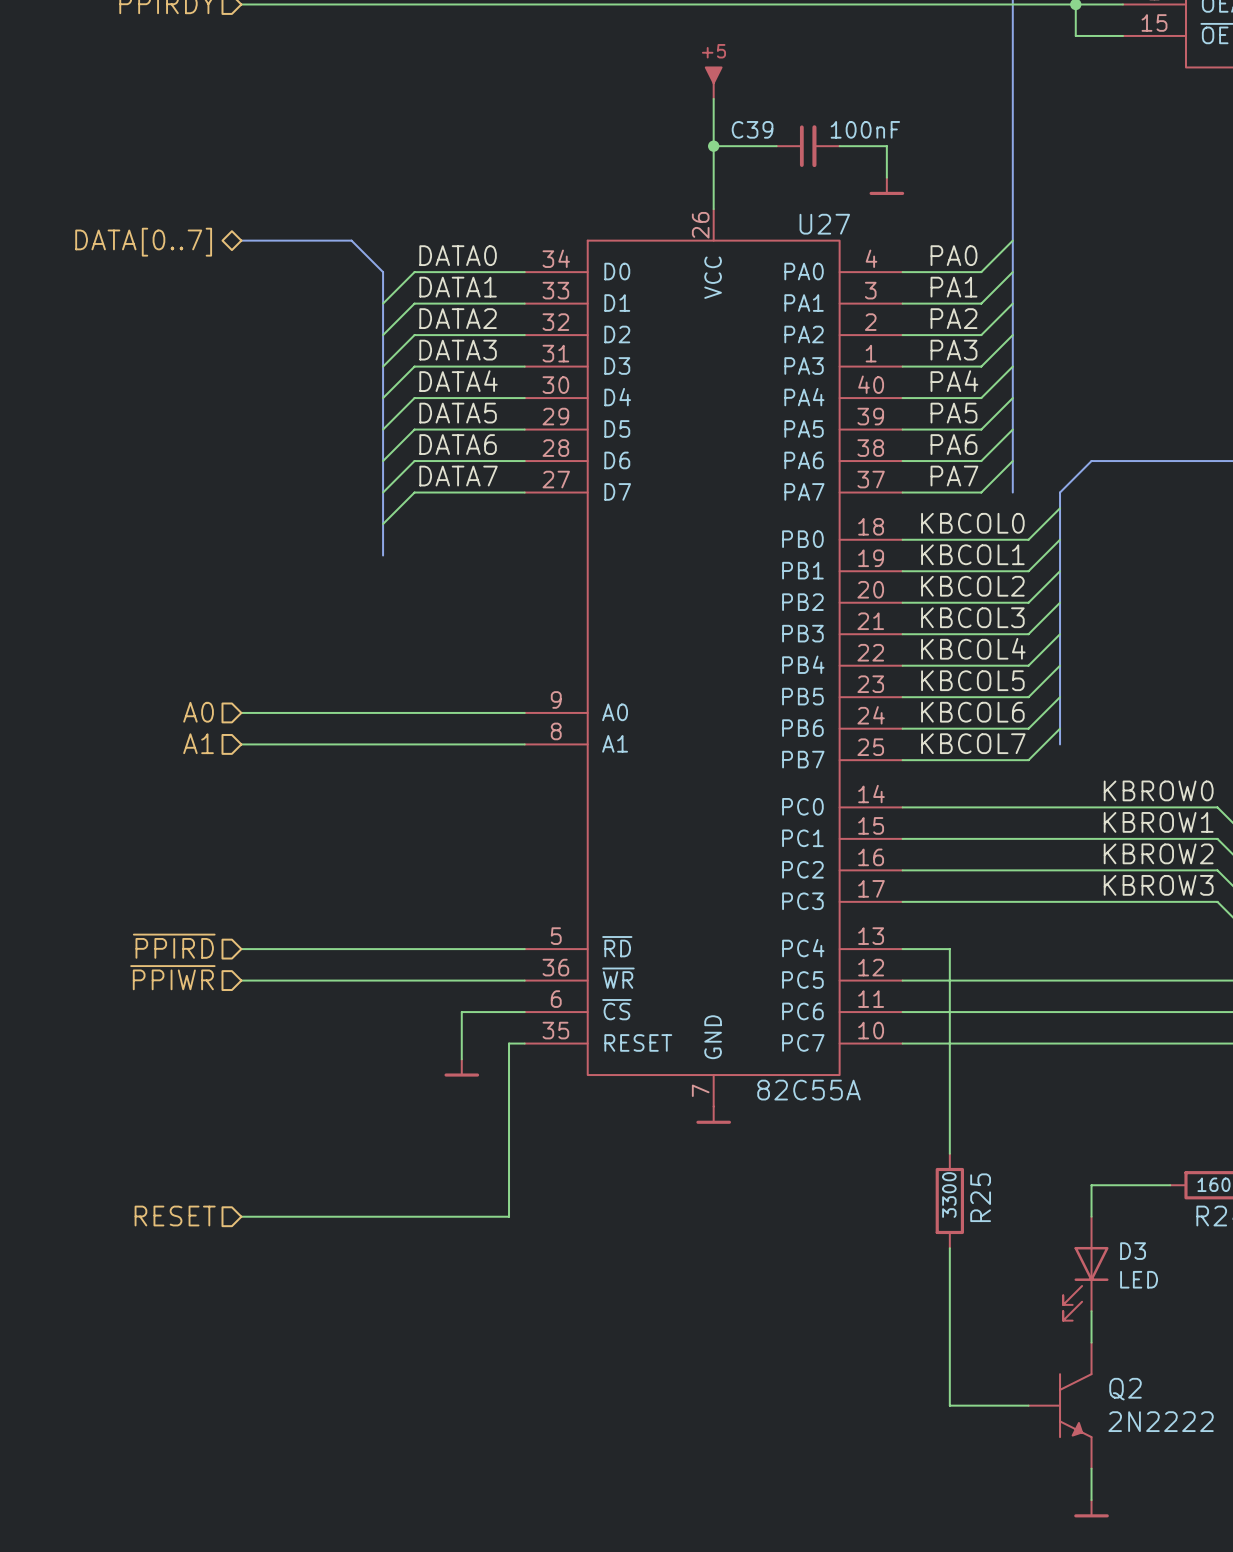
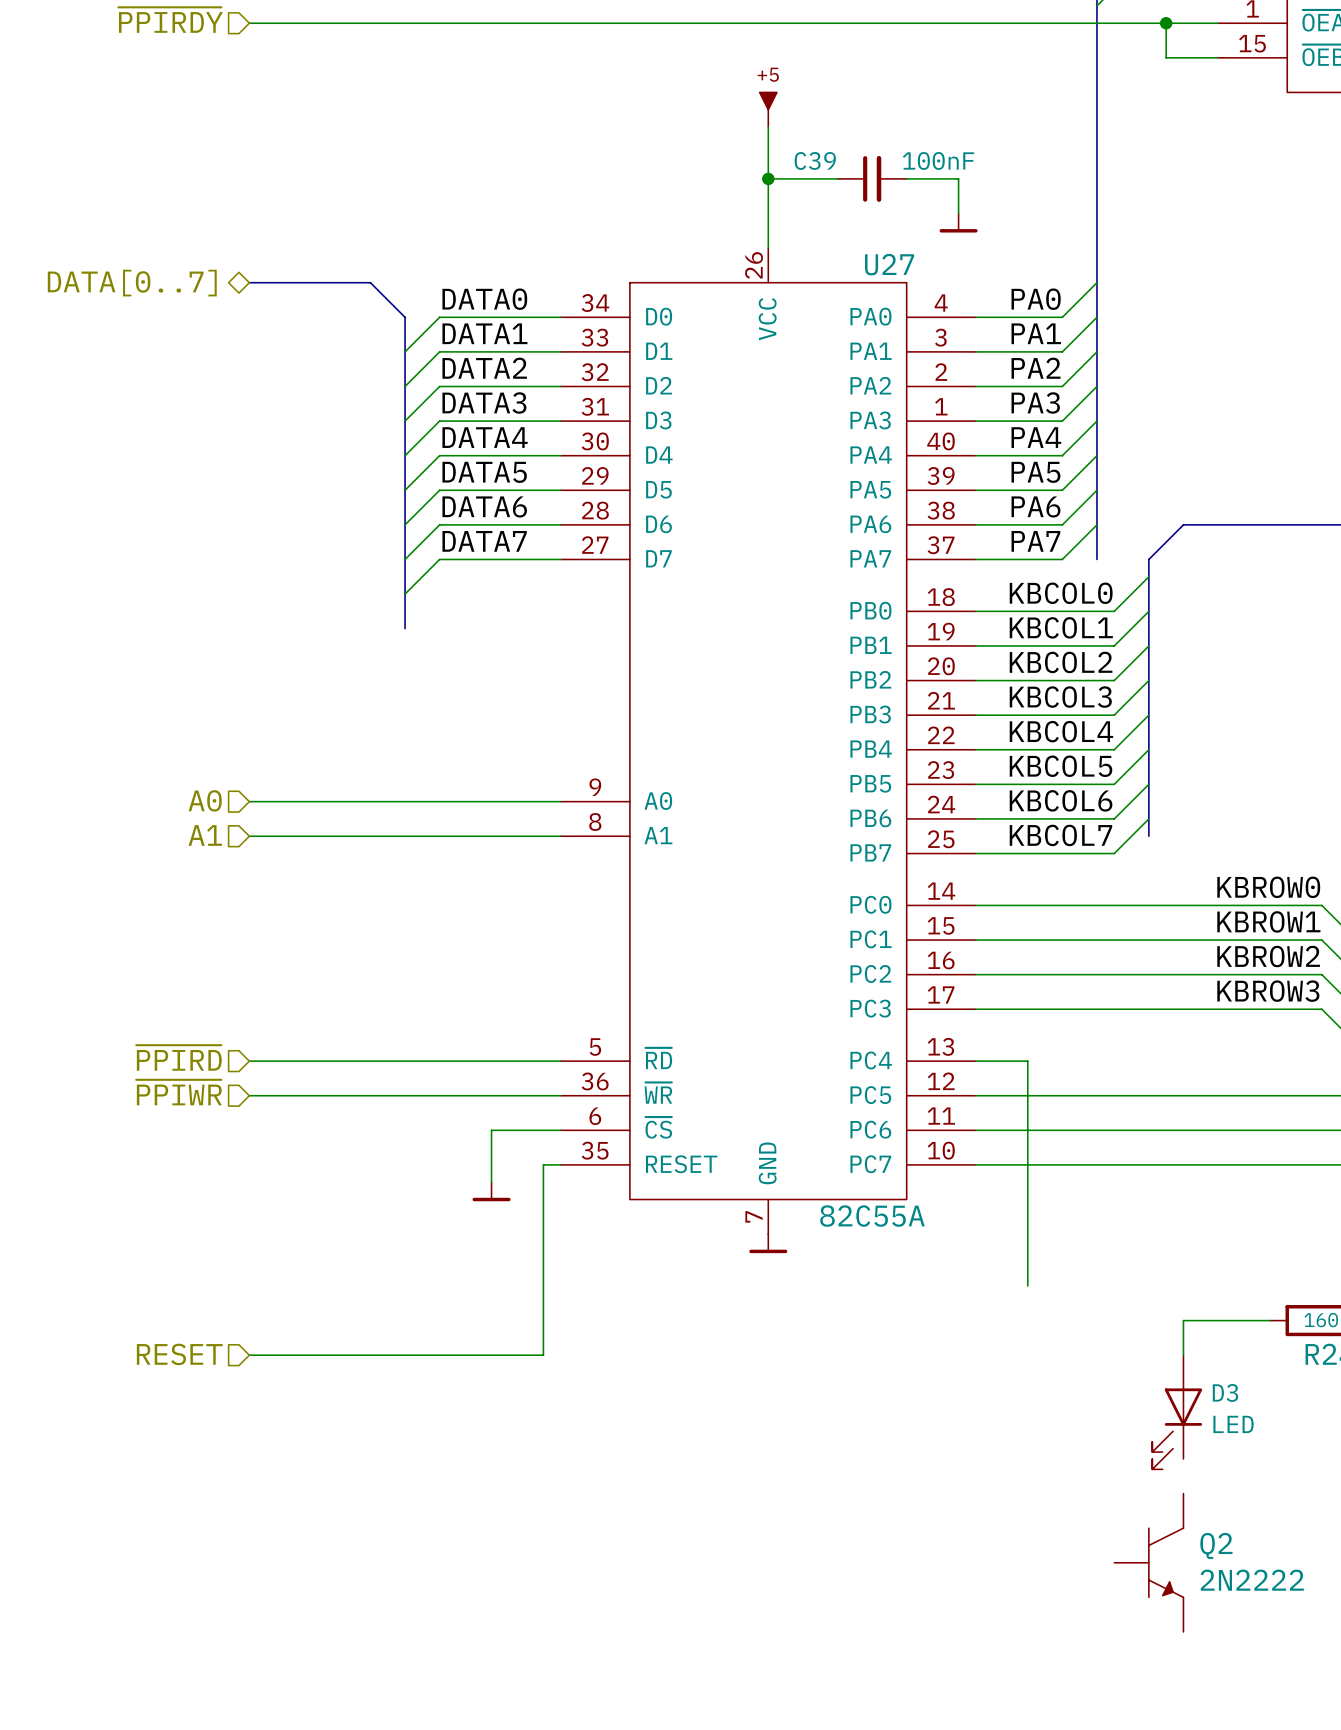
R25: 3300 (949, 1200) -> none
wire: (949, 1248) (949, 1405) (1028, 1405) -> none
wire: (1091, 1311) (1091, 1342) -> none
wire: (1091, 1468) (1091, 1500) -> none
power symbol: (1091, 1508) -> none

